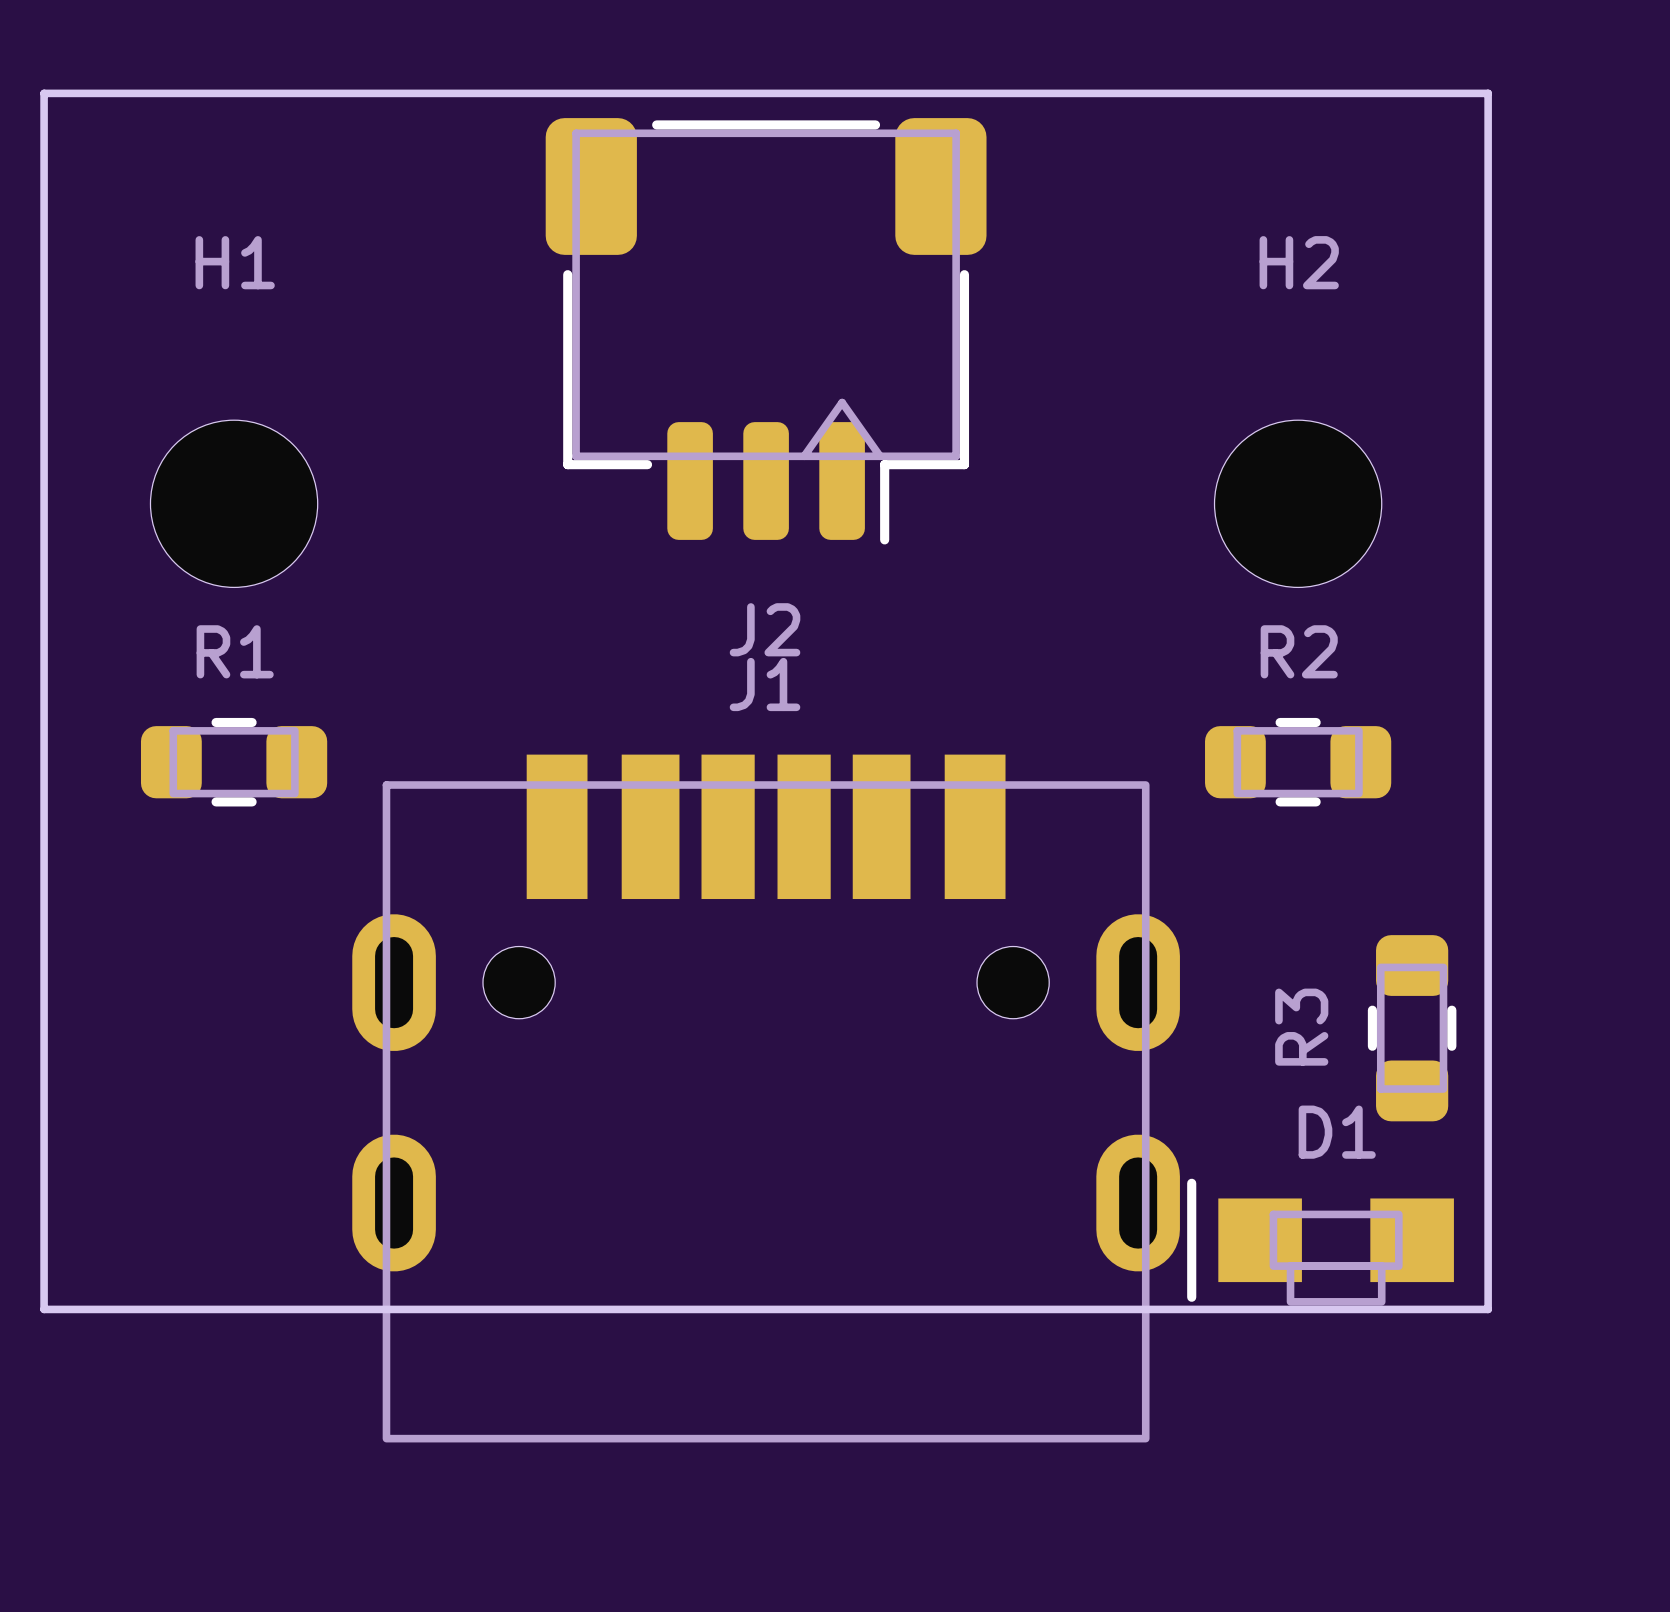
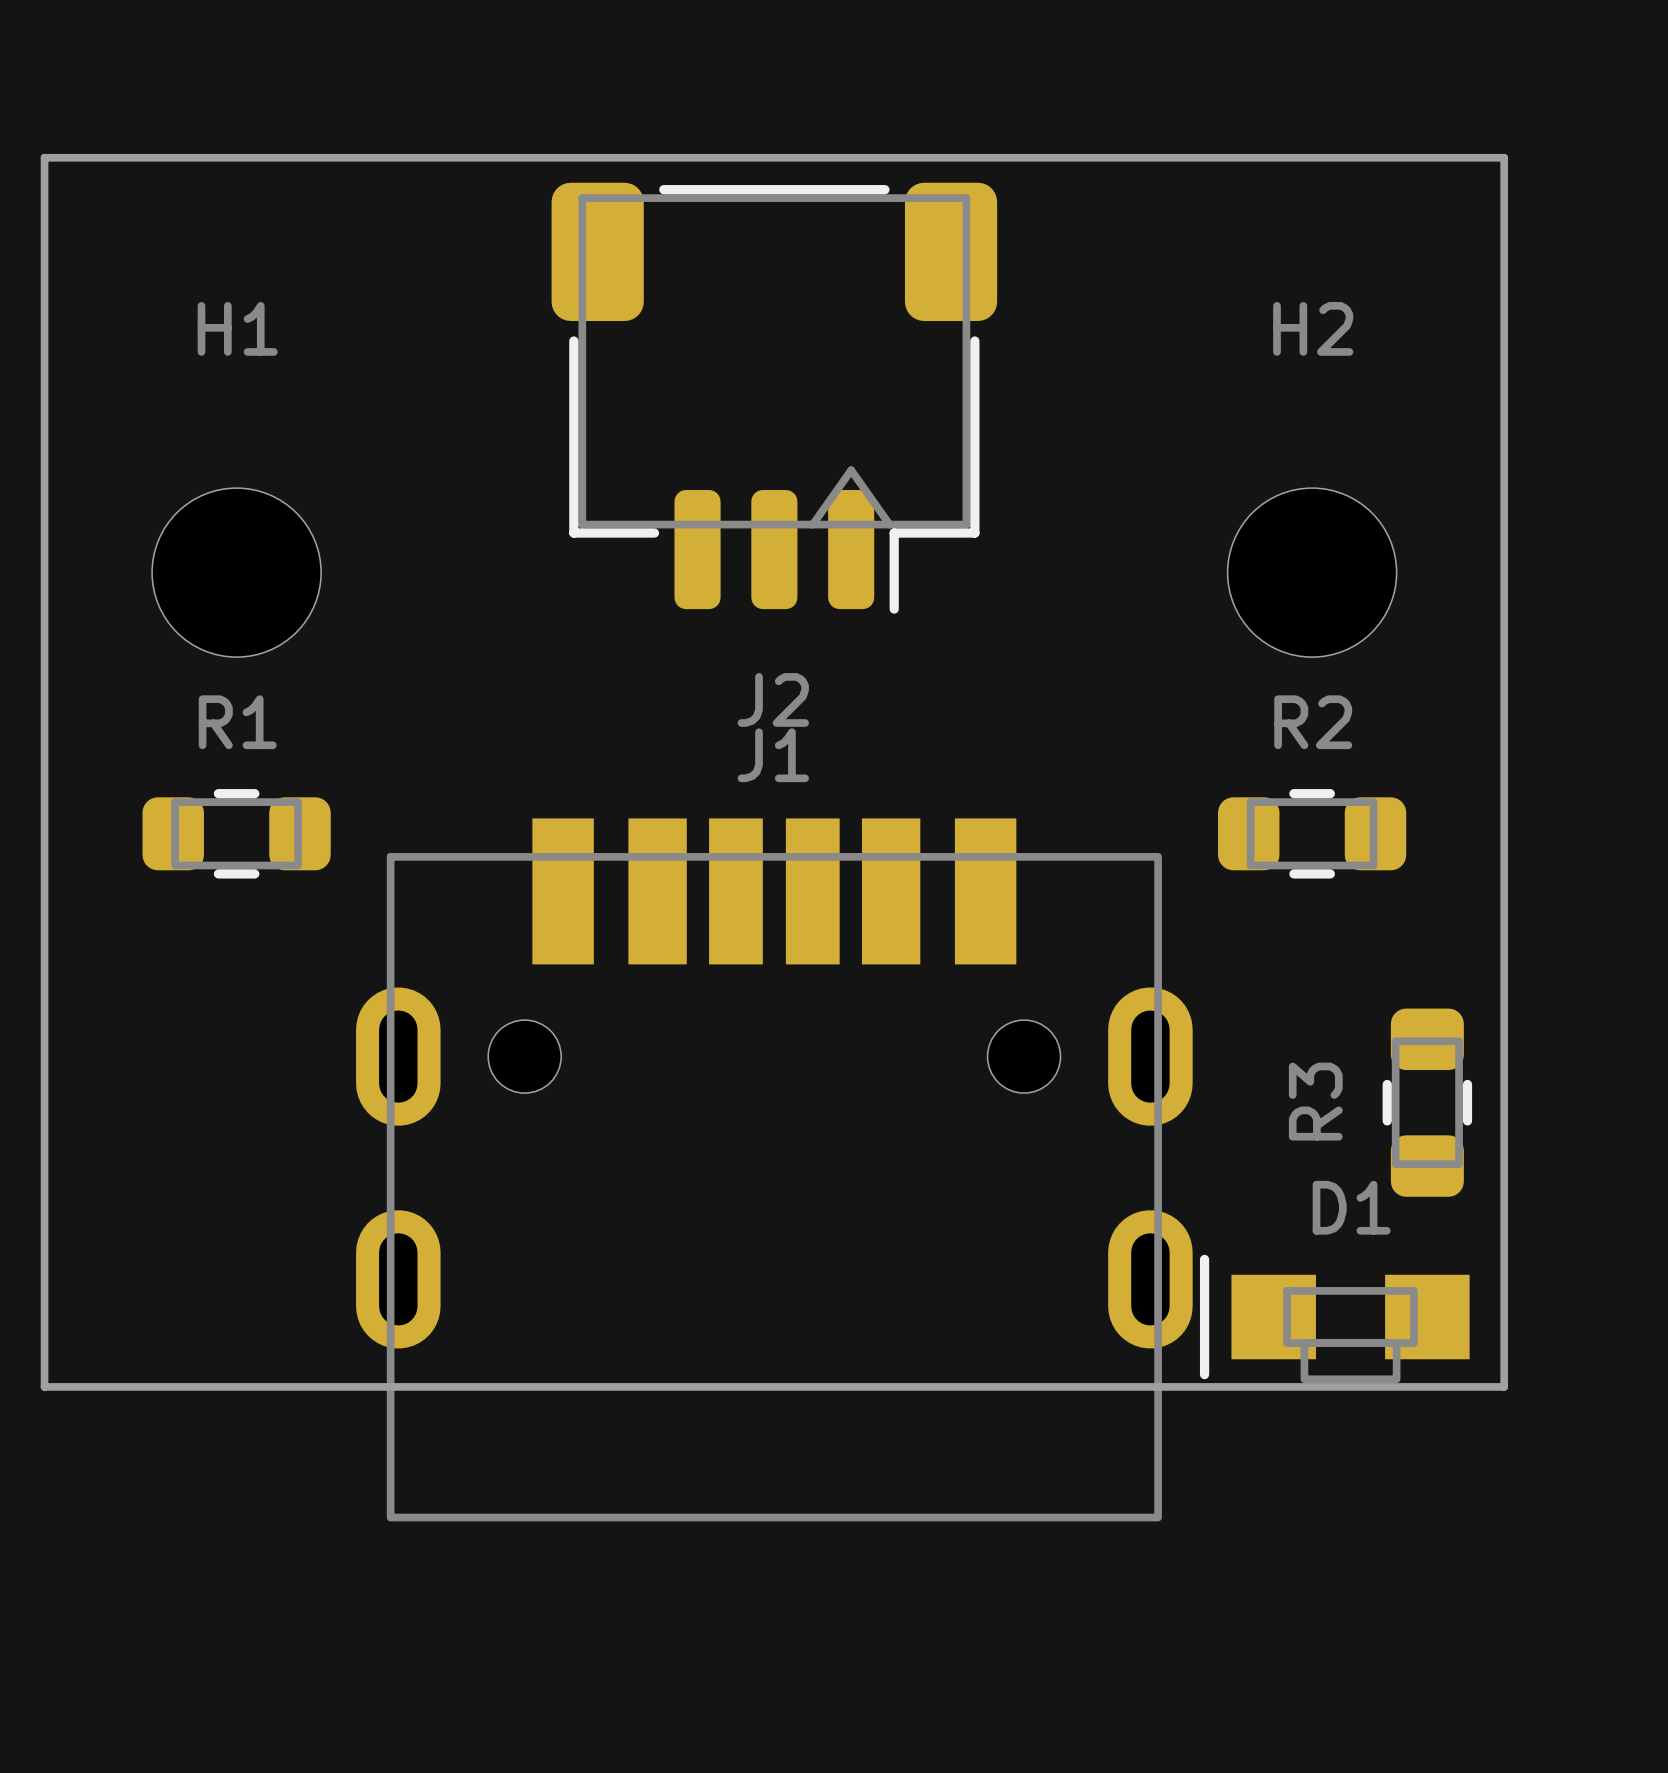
J1 footprint: [352, 754, 1180, 1443] -> [356, 818, 1193, 1522]

